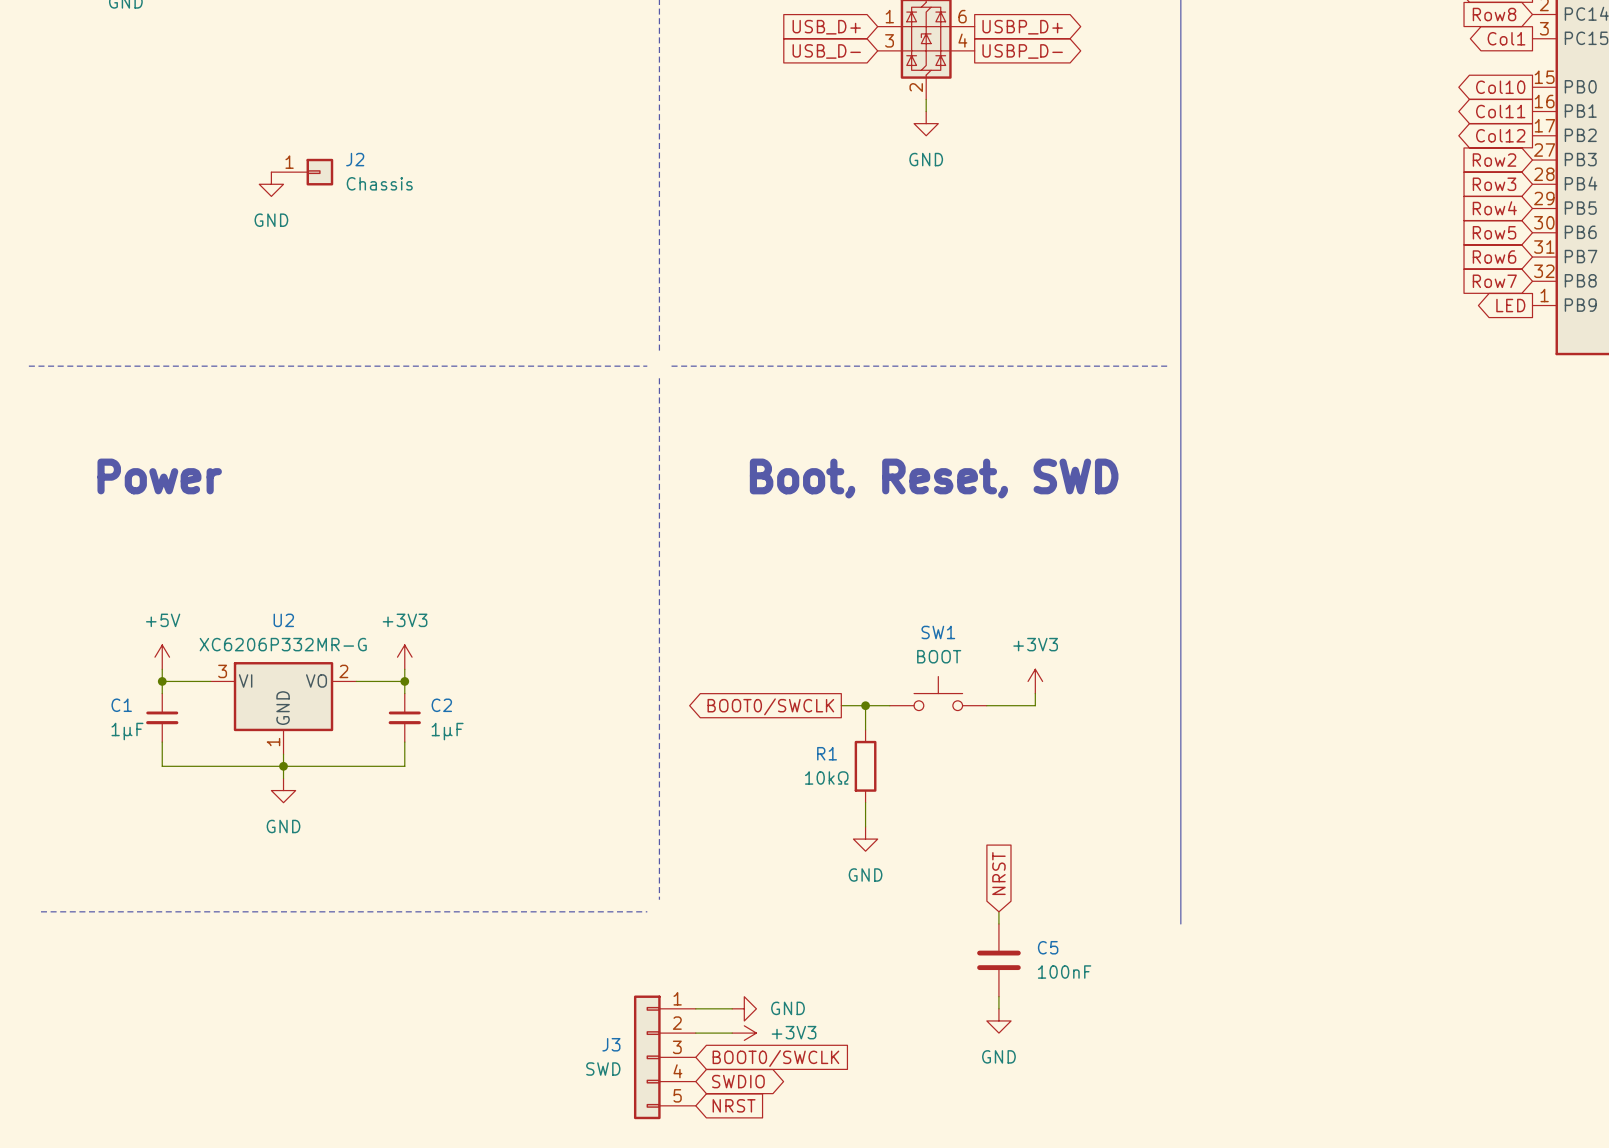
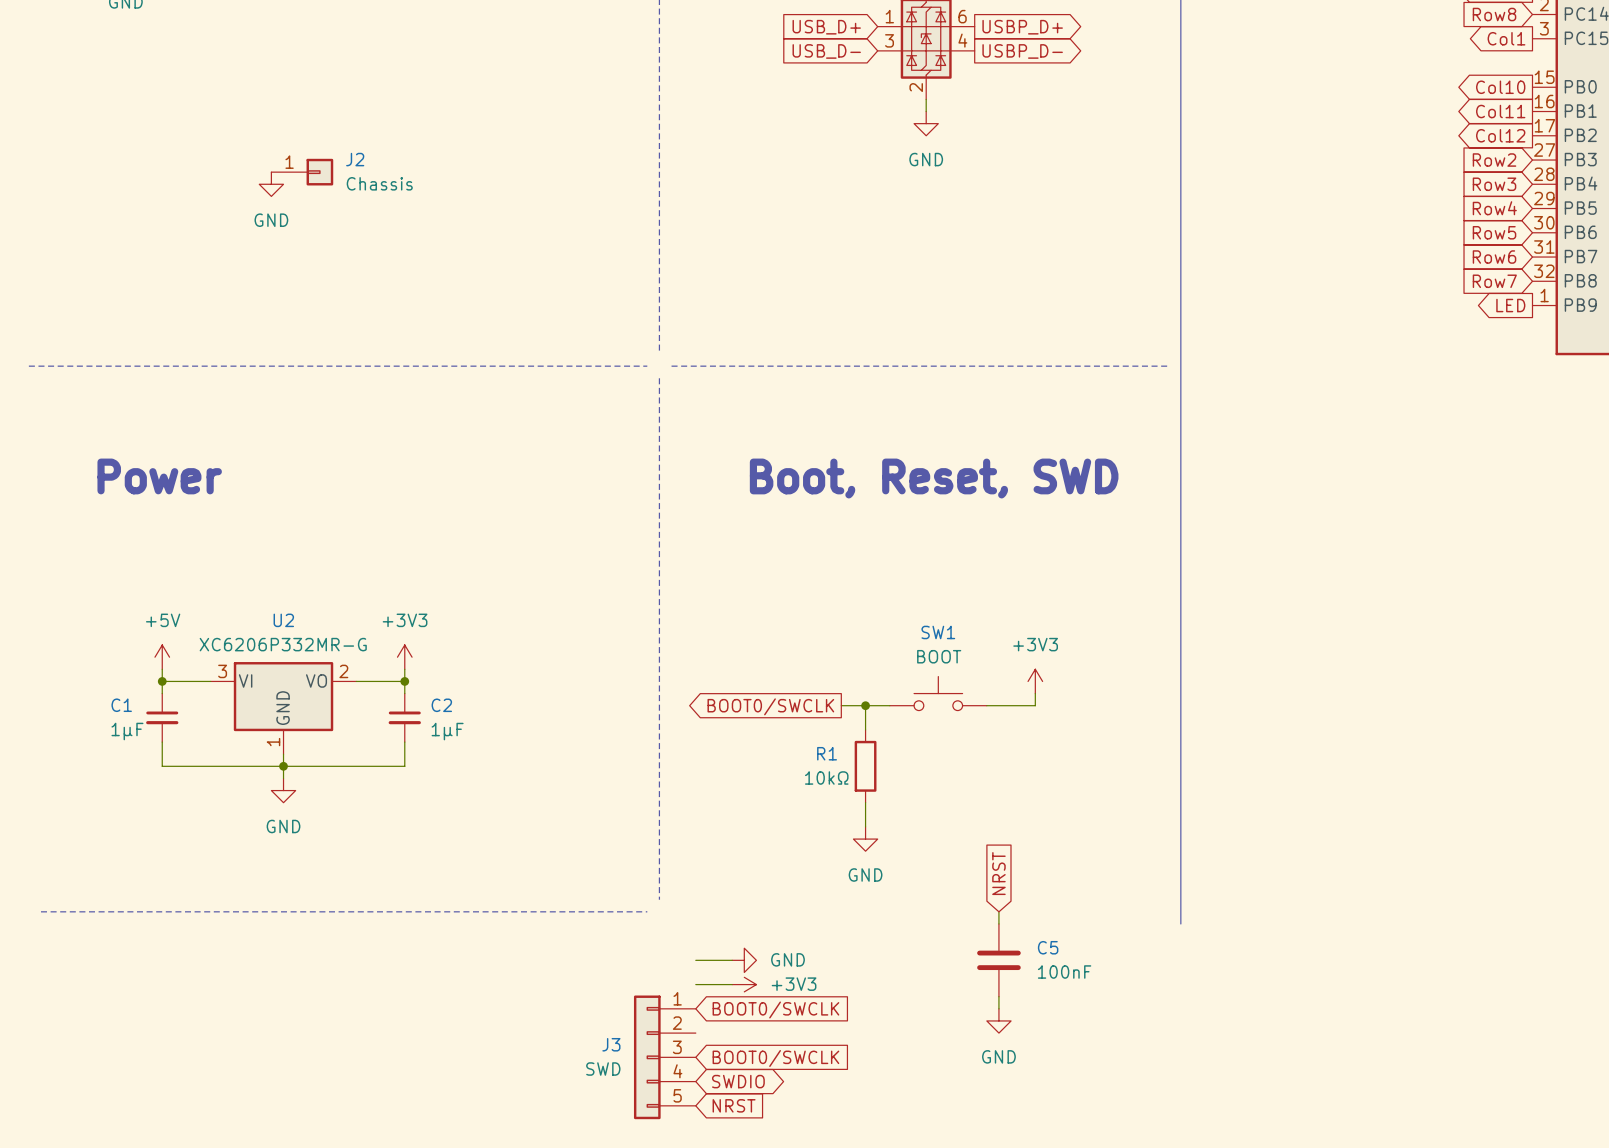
wire: (695, 1008) (732, 1008) -> (695, 960) (732, 960)
power symbol position: GND (744, 1008) -> GND (744, 960)
global label: none -> BOOT0/SWCLK (775, 1009)
wire: (695, 1033) (732, 1033) -> (695, 984) (732, 984)
power symbol position: +3V3 (744, 1033) -> +3V3 (744, 984)

